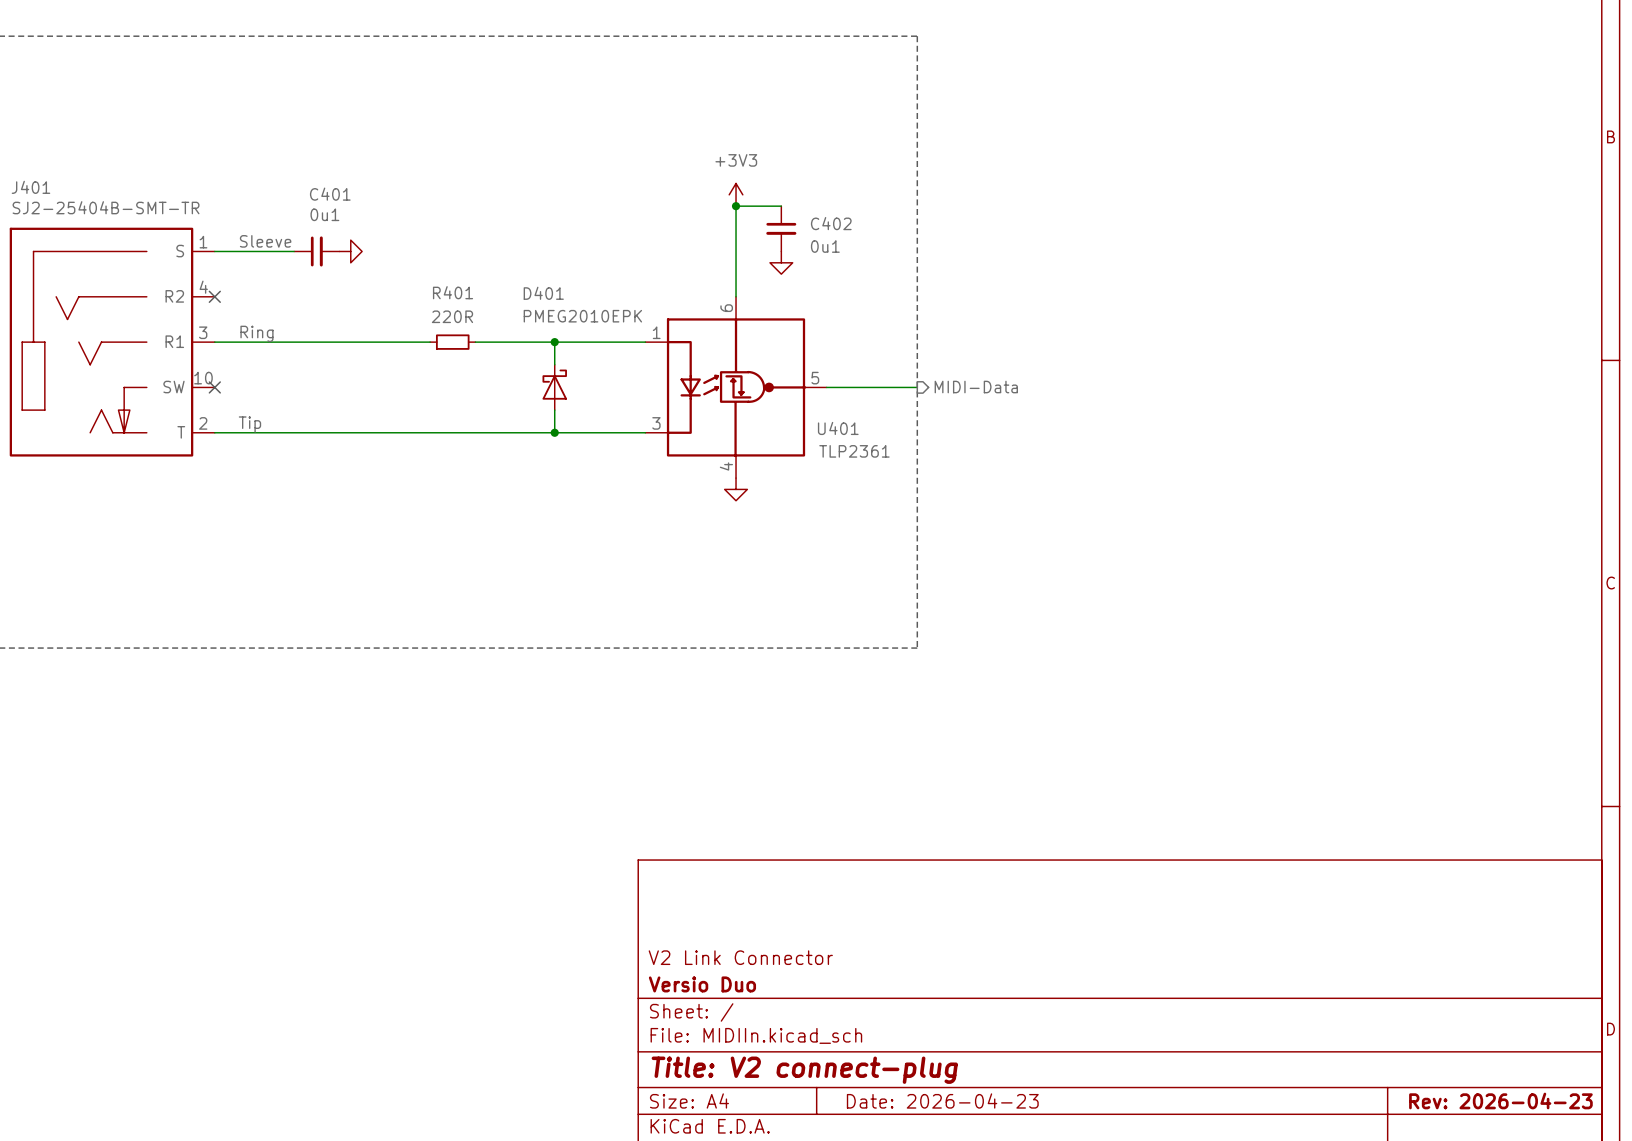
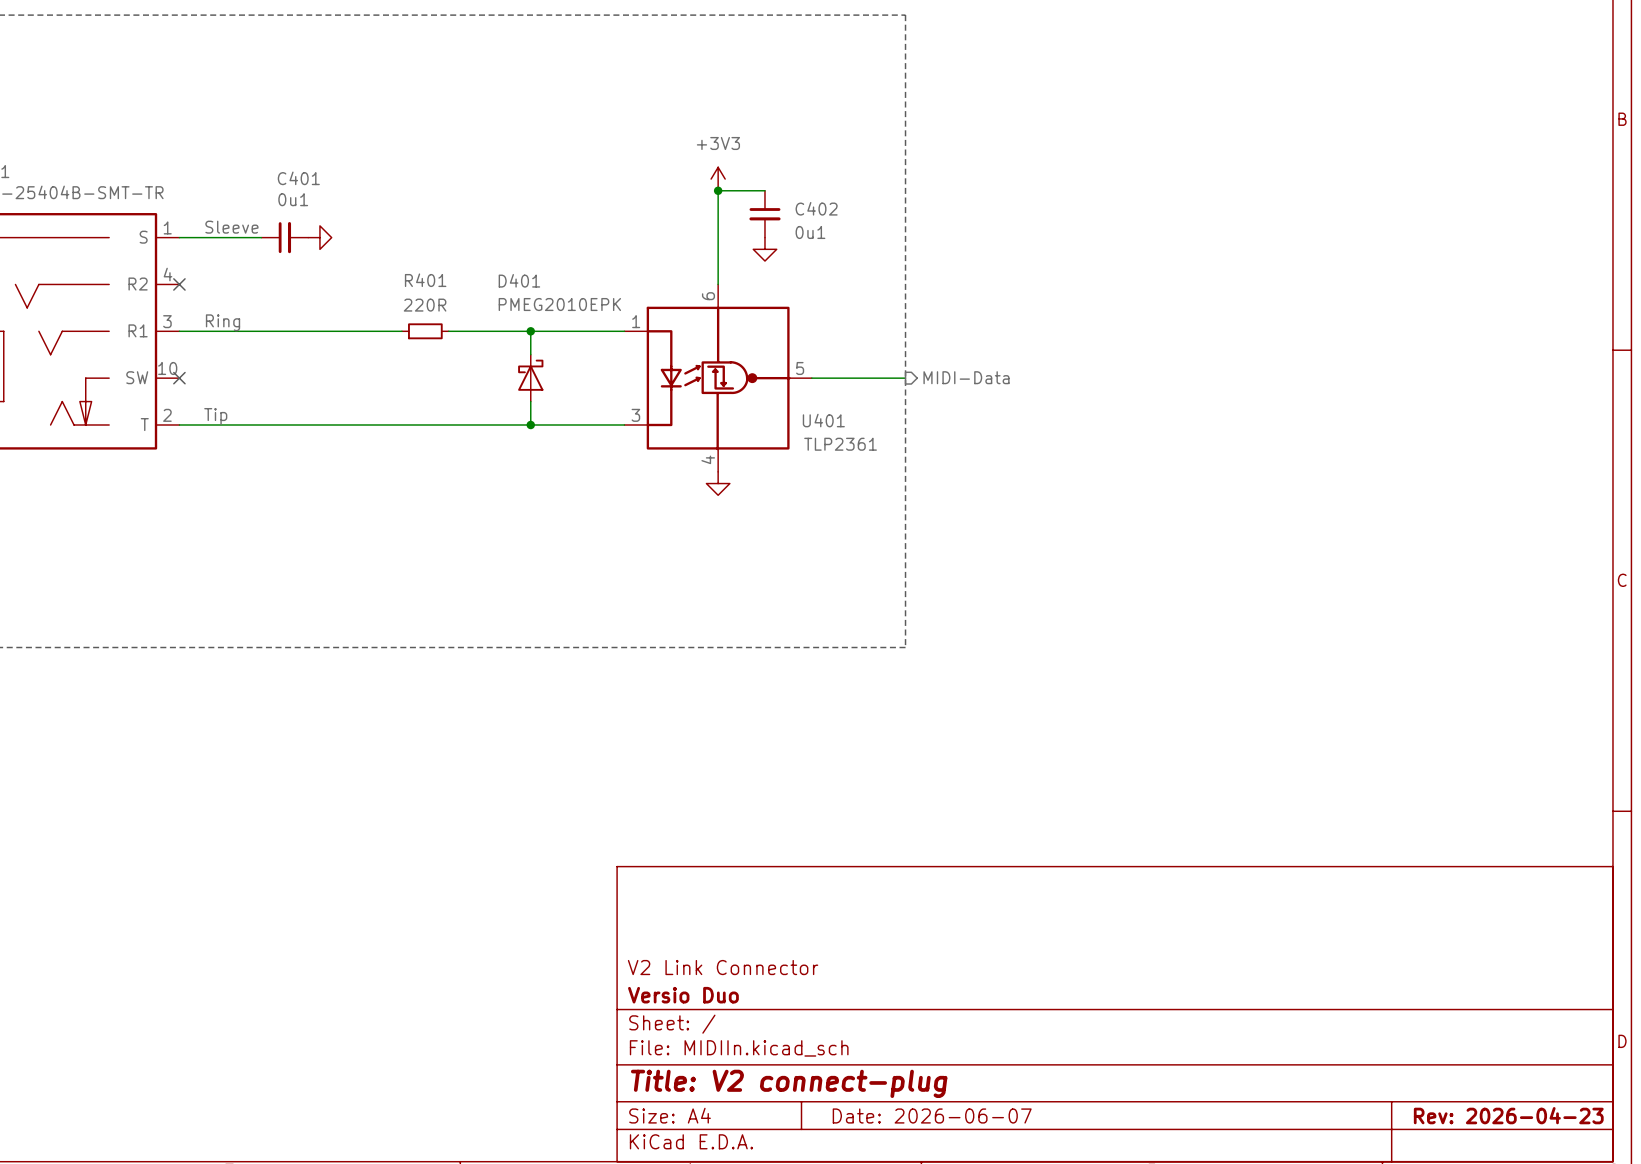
title block: Date: 2026-04-23 (942, 1100) -> Date: 2026-06-07 (932, 1115)

